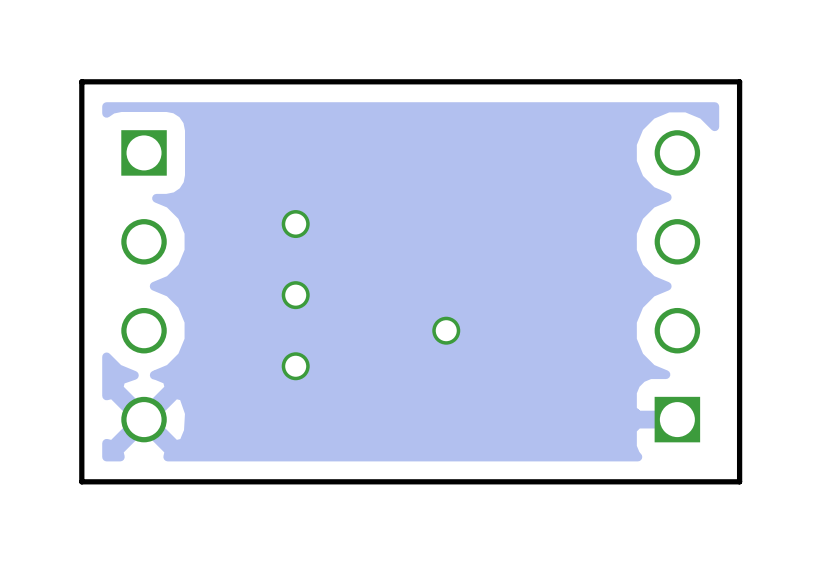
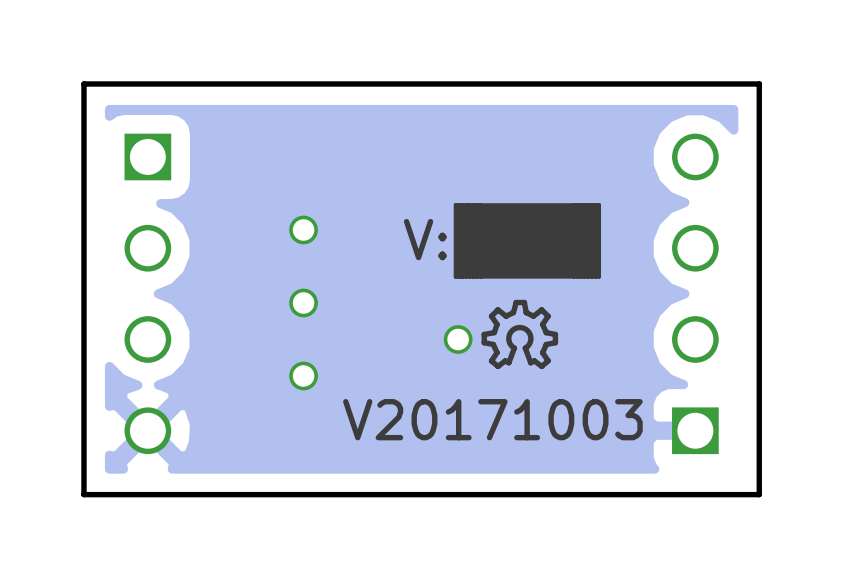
drawing: none -> [453, 203, 602, 370]

